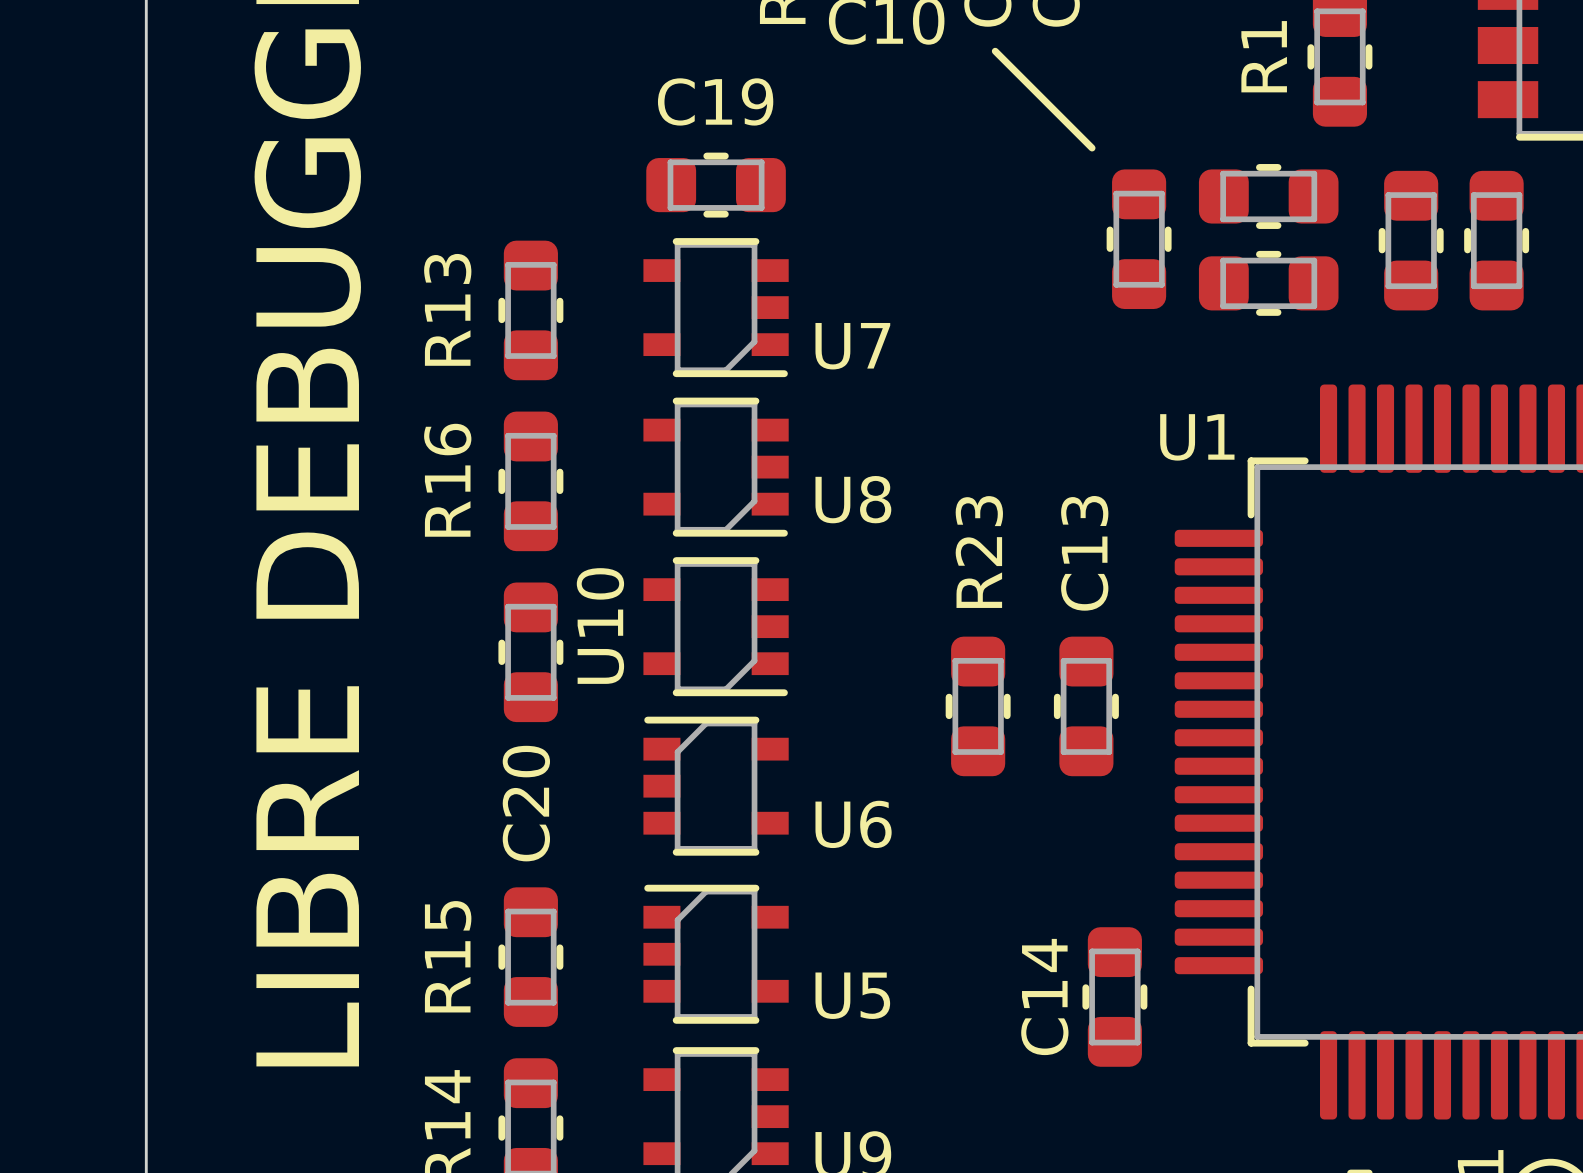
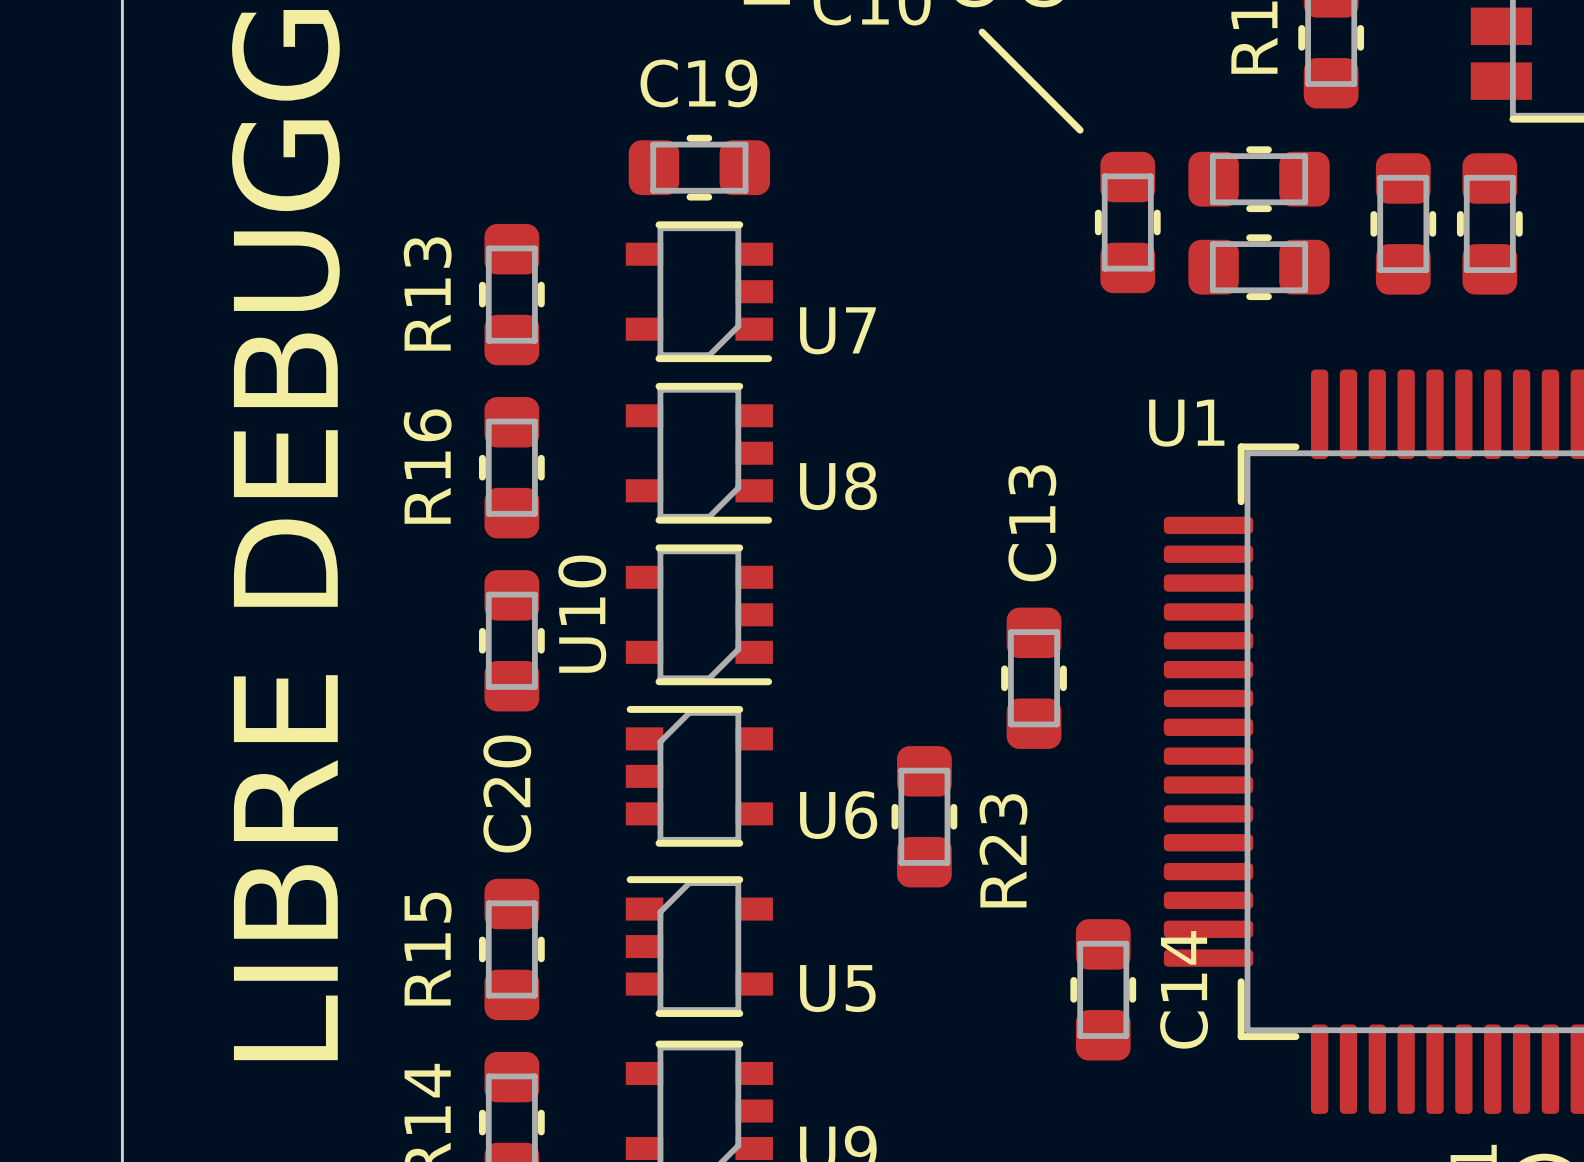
R23 name position: R23 (979, 552) -> R23 (1003, 850)
R23 position: (978, 706) -> (924, 816)
C13 position: (1086, 706) -> (1034, 678)
C14 name position: C14 (1044, 996) -> C14 (1184, 989)

